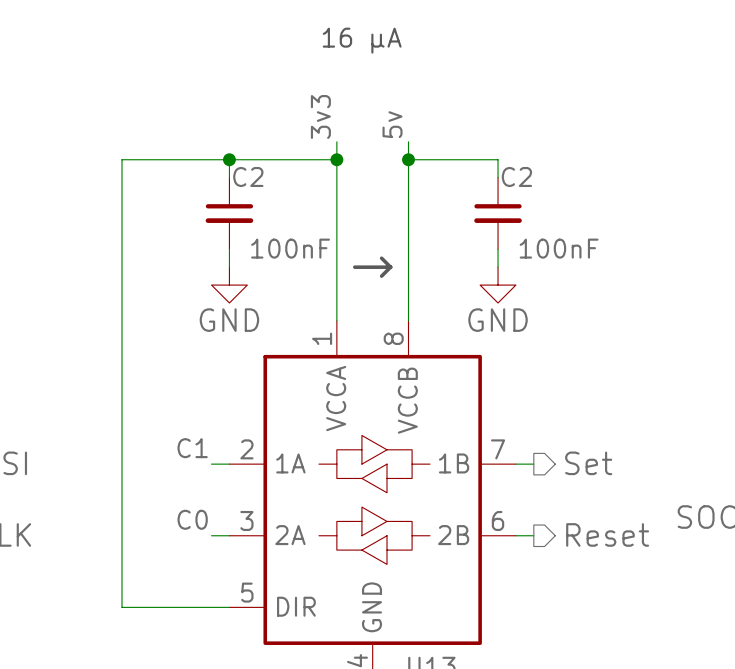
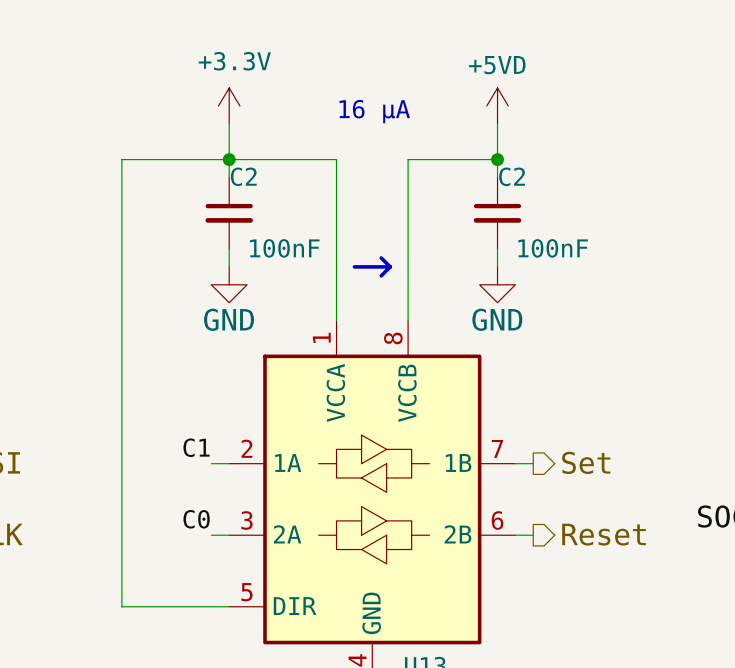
text position: 16 μA (362, 40) -> 16 μA (374, 111)
power symbol: none -> +3.3V (229, 105)
power symbol: none -> +5VD (497, 105)
label: 3v3 (320, 116) -> none
wire: none -> (229, 123) (229, 159)
wire: none -> (497, 123) (497, 159)
label: 5v (392, 124) -> none
wire: (336, 141) (336, 159) -> none
wire: (408, 141) (408, 159) -> none
junction: (336, 159) -> none
junction: (408, 159) -> none
junction: none -> (497, 159)

